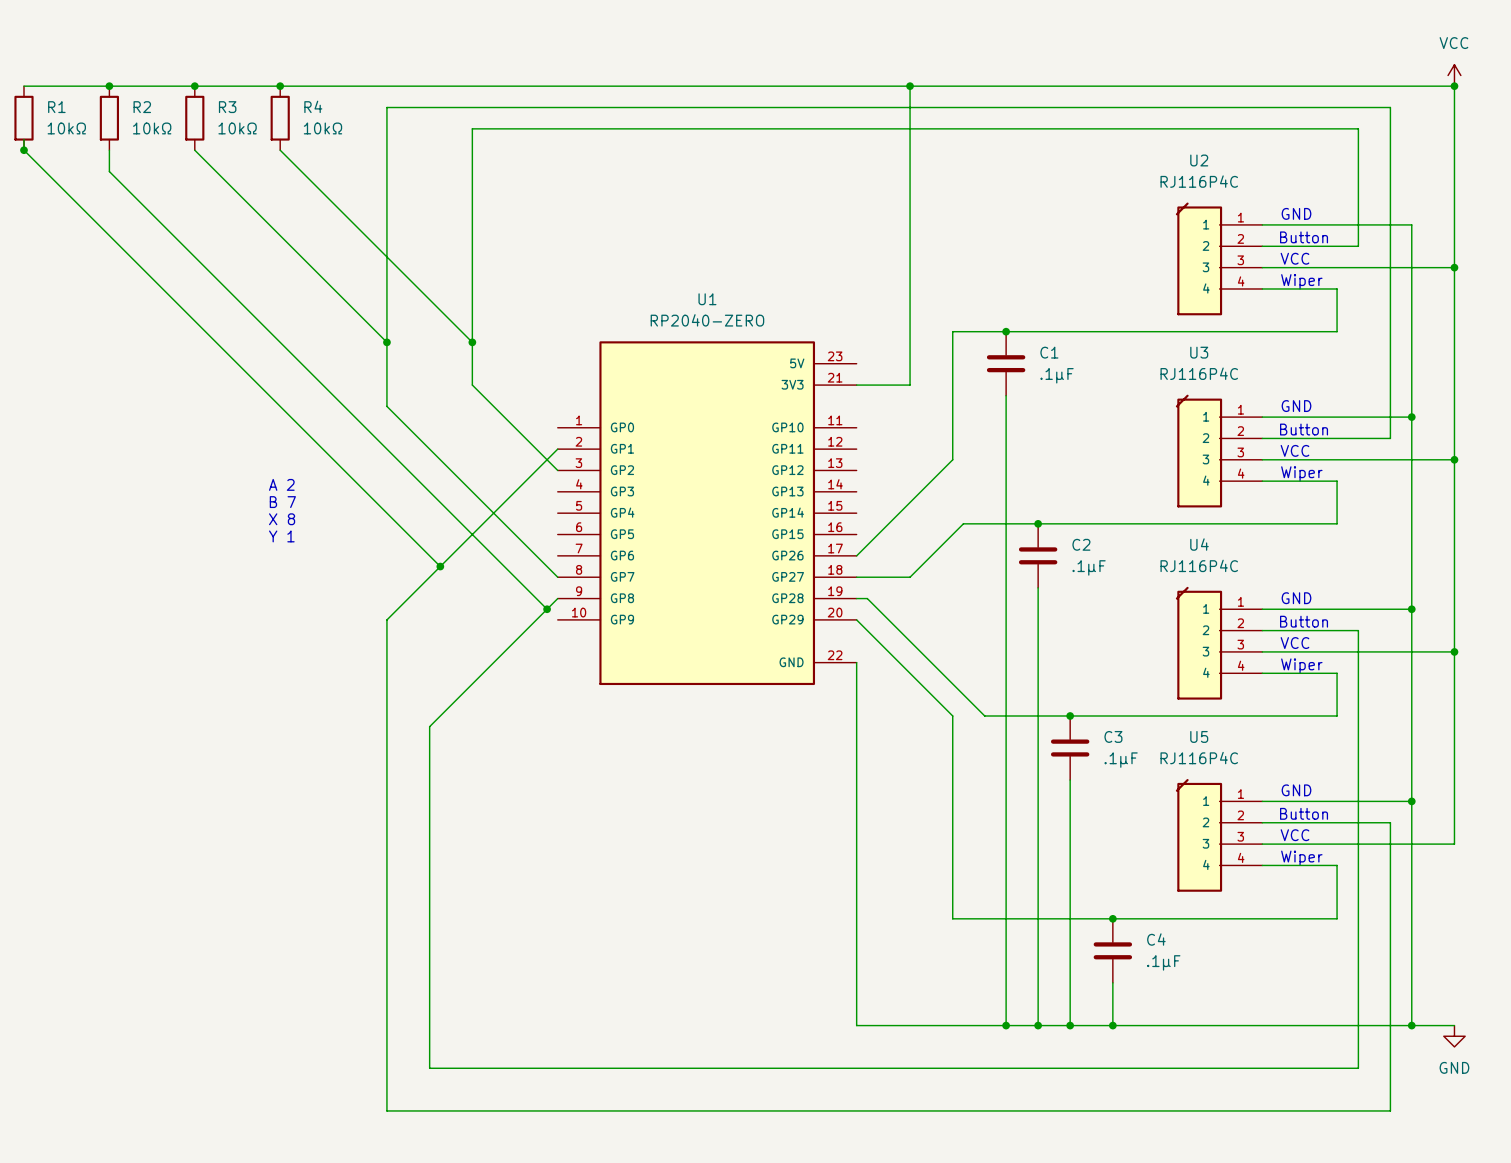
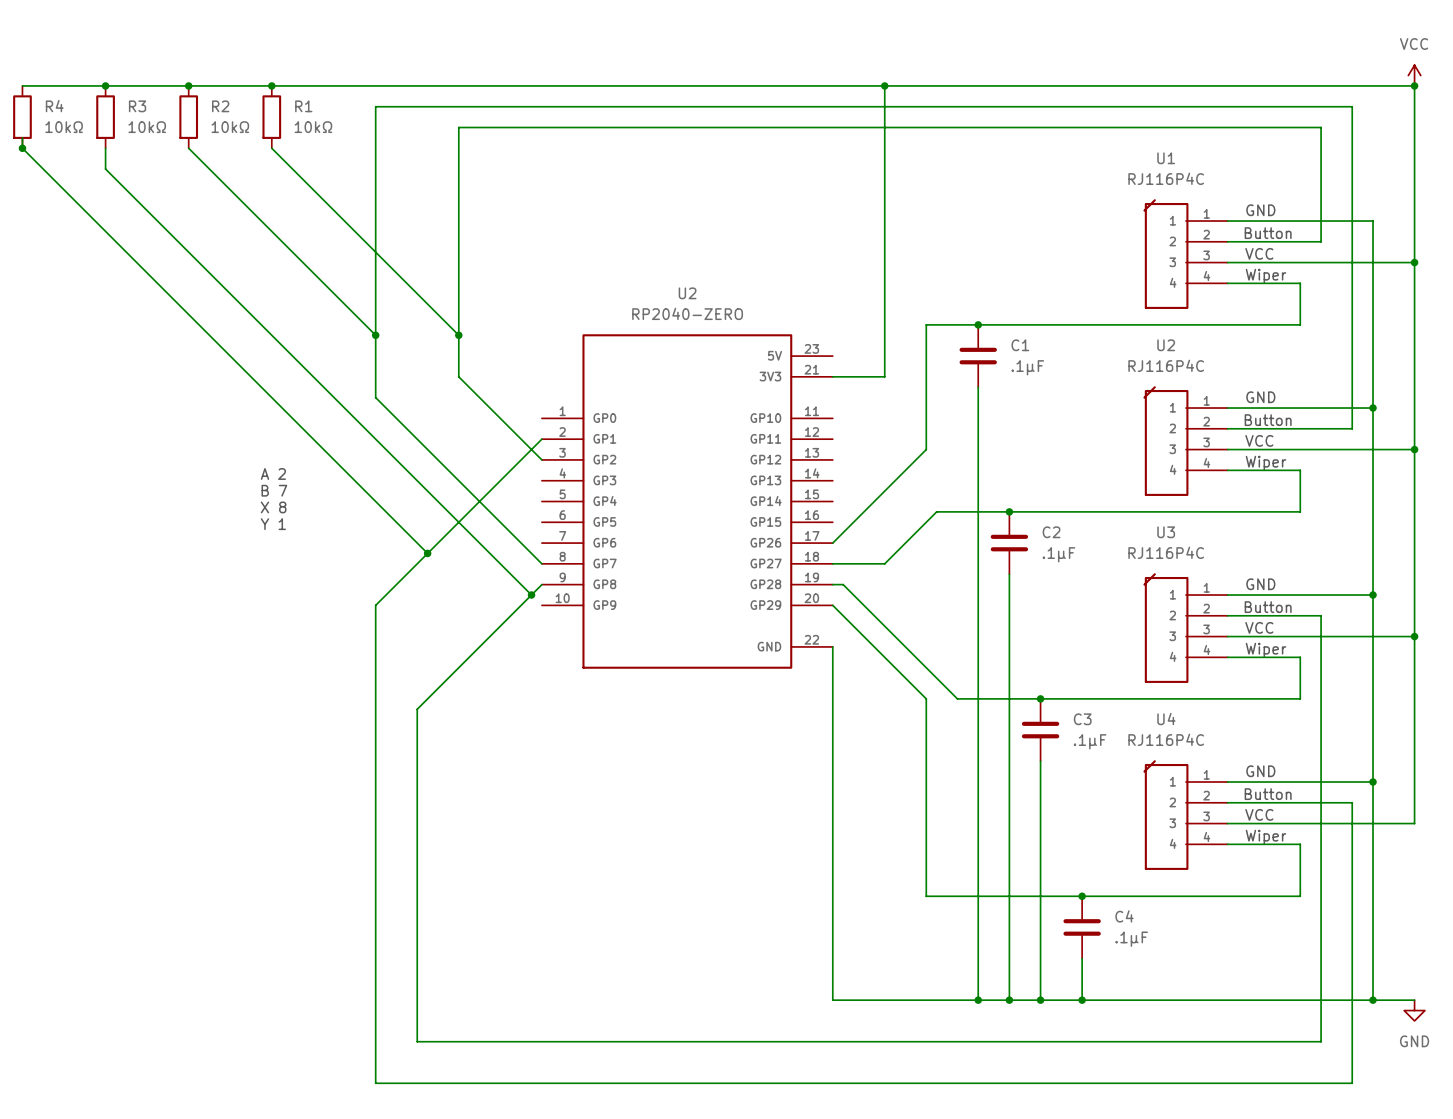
R4 name: R4 (313, 106) -> R1 (303, 106)
R1 name: R1 (56, 107) -> R4 (54, 106)
R2 name: R2 (142, 107) -> R3 (137, 106)
R3 name: R3 (227, 107) -> R2 (220, 106)
U2 name: U2 (1199, 160) -> U1 (1166, 158)
U1 name: U1 (707, 299) -> U2 (687, 293)
U3 name: U3 (1199, 352) -> U2 (1166, 345)
U4 name: U4 (1199, 544) -> U3 (1166, 532)
U5 name: U5 (1199, 736) -> U4 (1166, 719)

